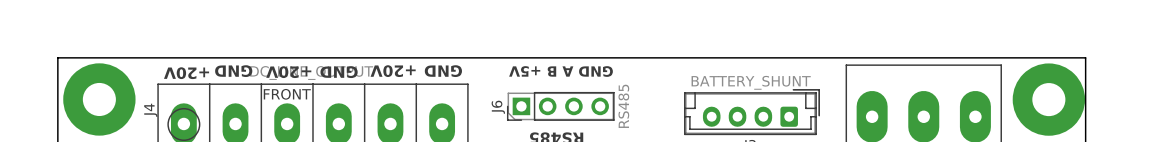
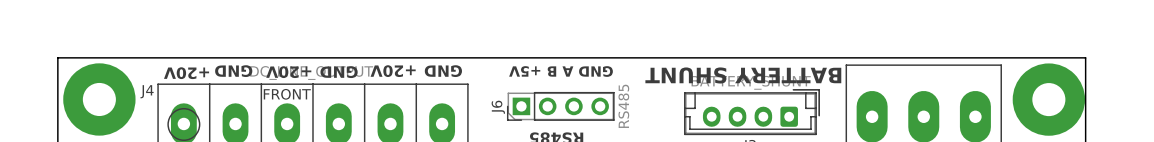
text: none -> BATTERY SHUNT (743, 75)
J4 name rotation: 0° (150, 110) -> 90° clockwise (147, 91)

